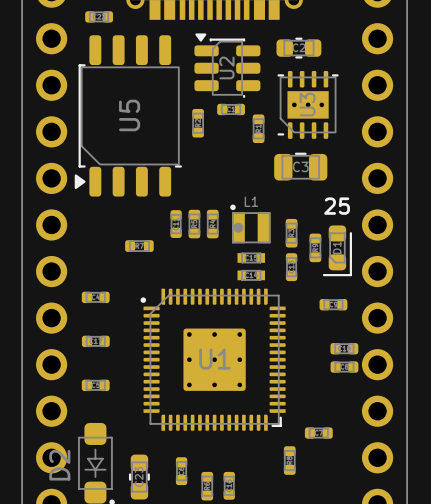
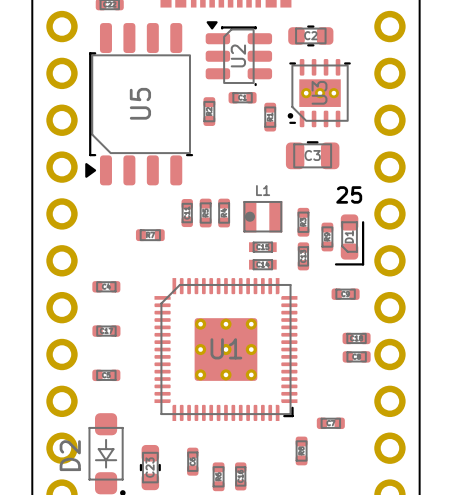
drawing position: (232, 207) -> (290, 115)
drawing: [140, 297, 147, 303] -> none

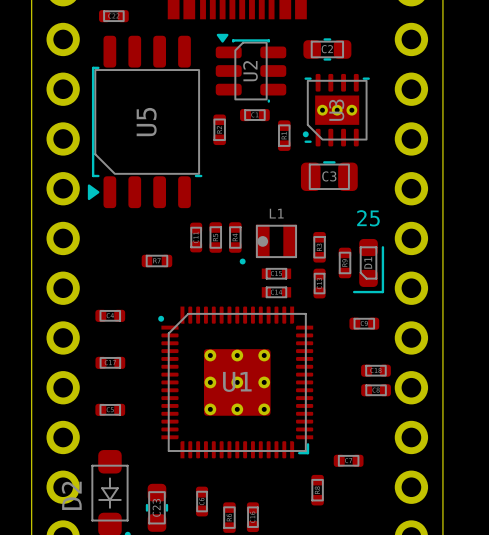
drawing: none -> [239, 258, 246, 265]
drawing: none -> [158, 315, 165, 322]

